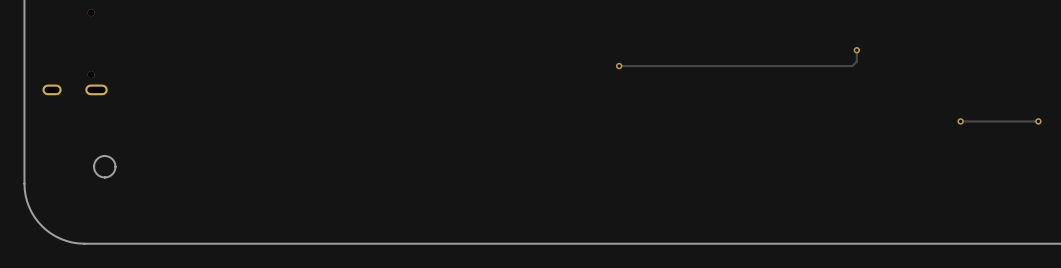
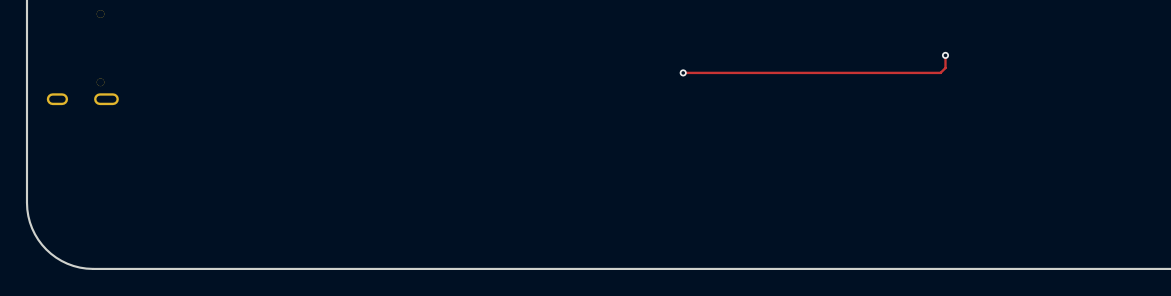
track: (960, 121) (1038, 121) -> none
via: (960, 121) -> none
via: (1038, 121) -> none
board edge: (104, 156) (97, 159) (94, 166) (97, 174) (104, 177) (112, 174) (115, 166) (112, 159) (104, 156) -> none

